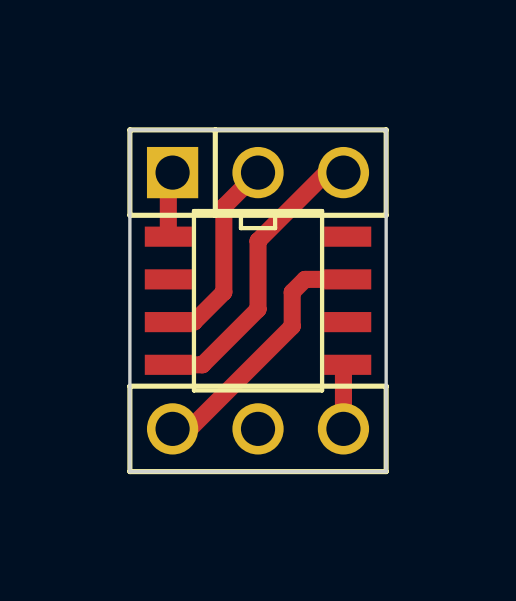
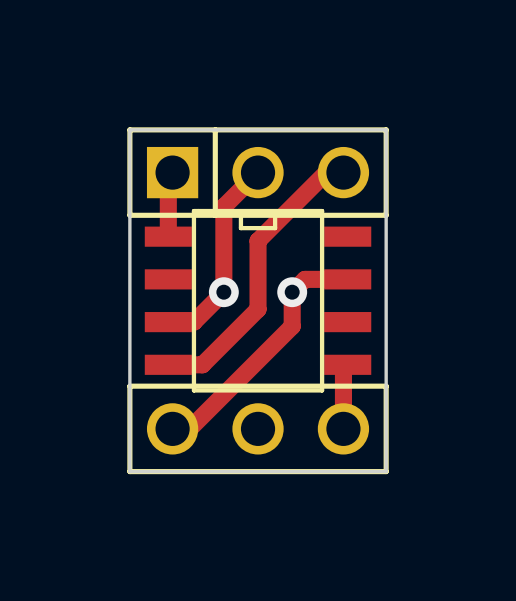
via: none -> (223, 292)
via: none -> (292, 292)

